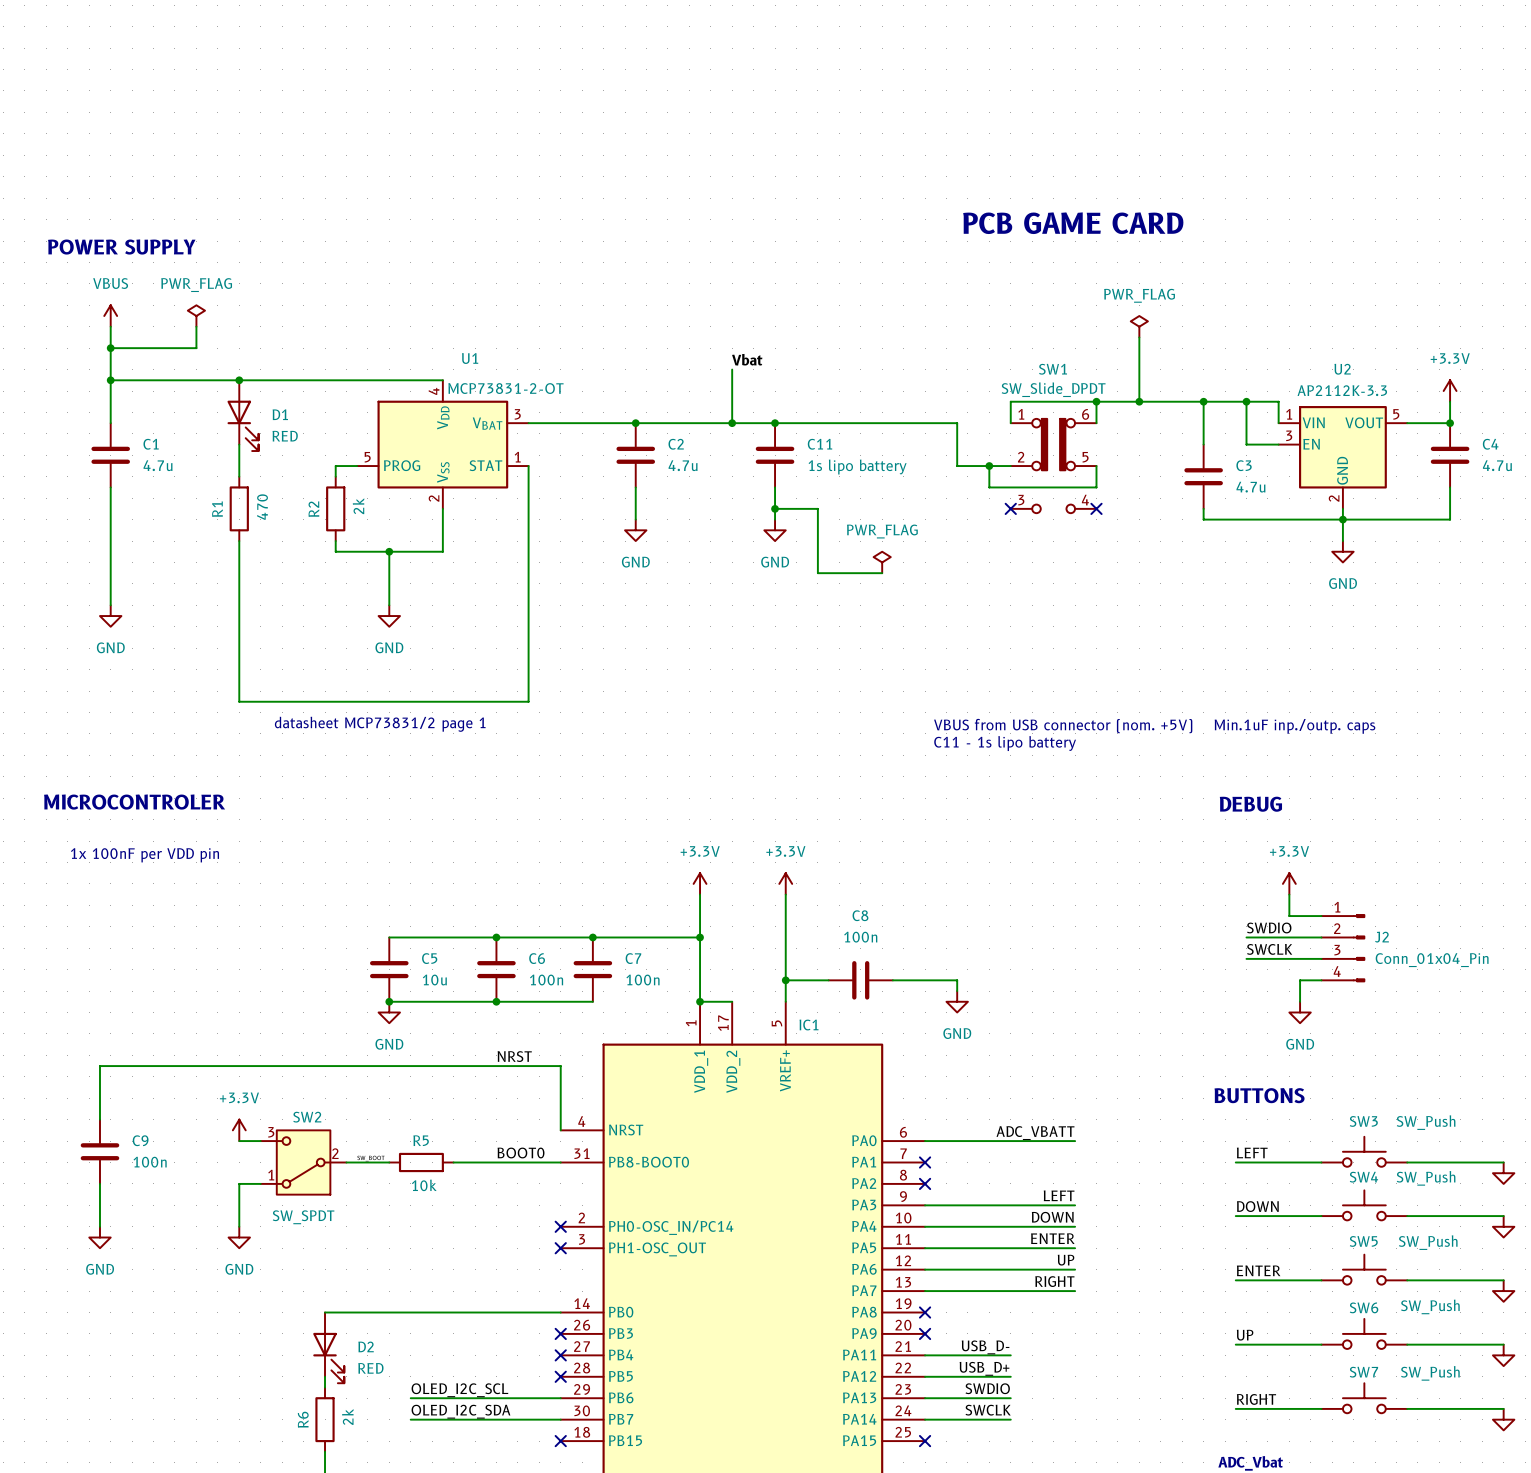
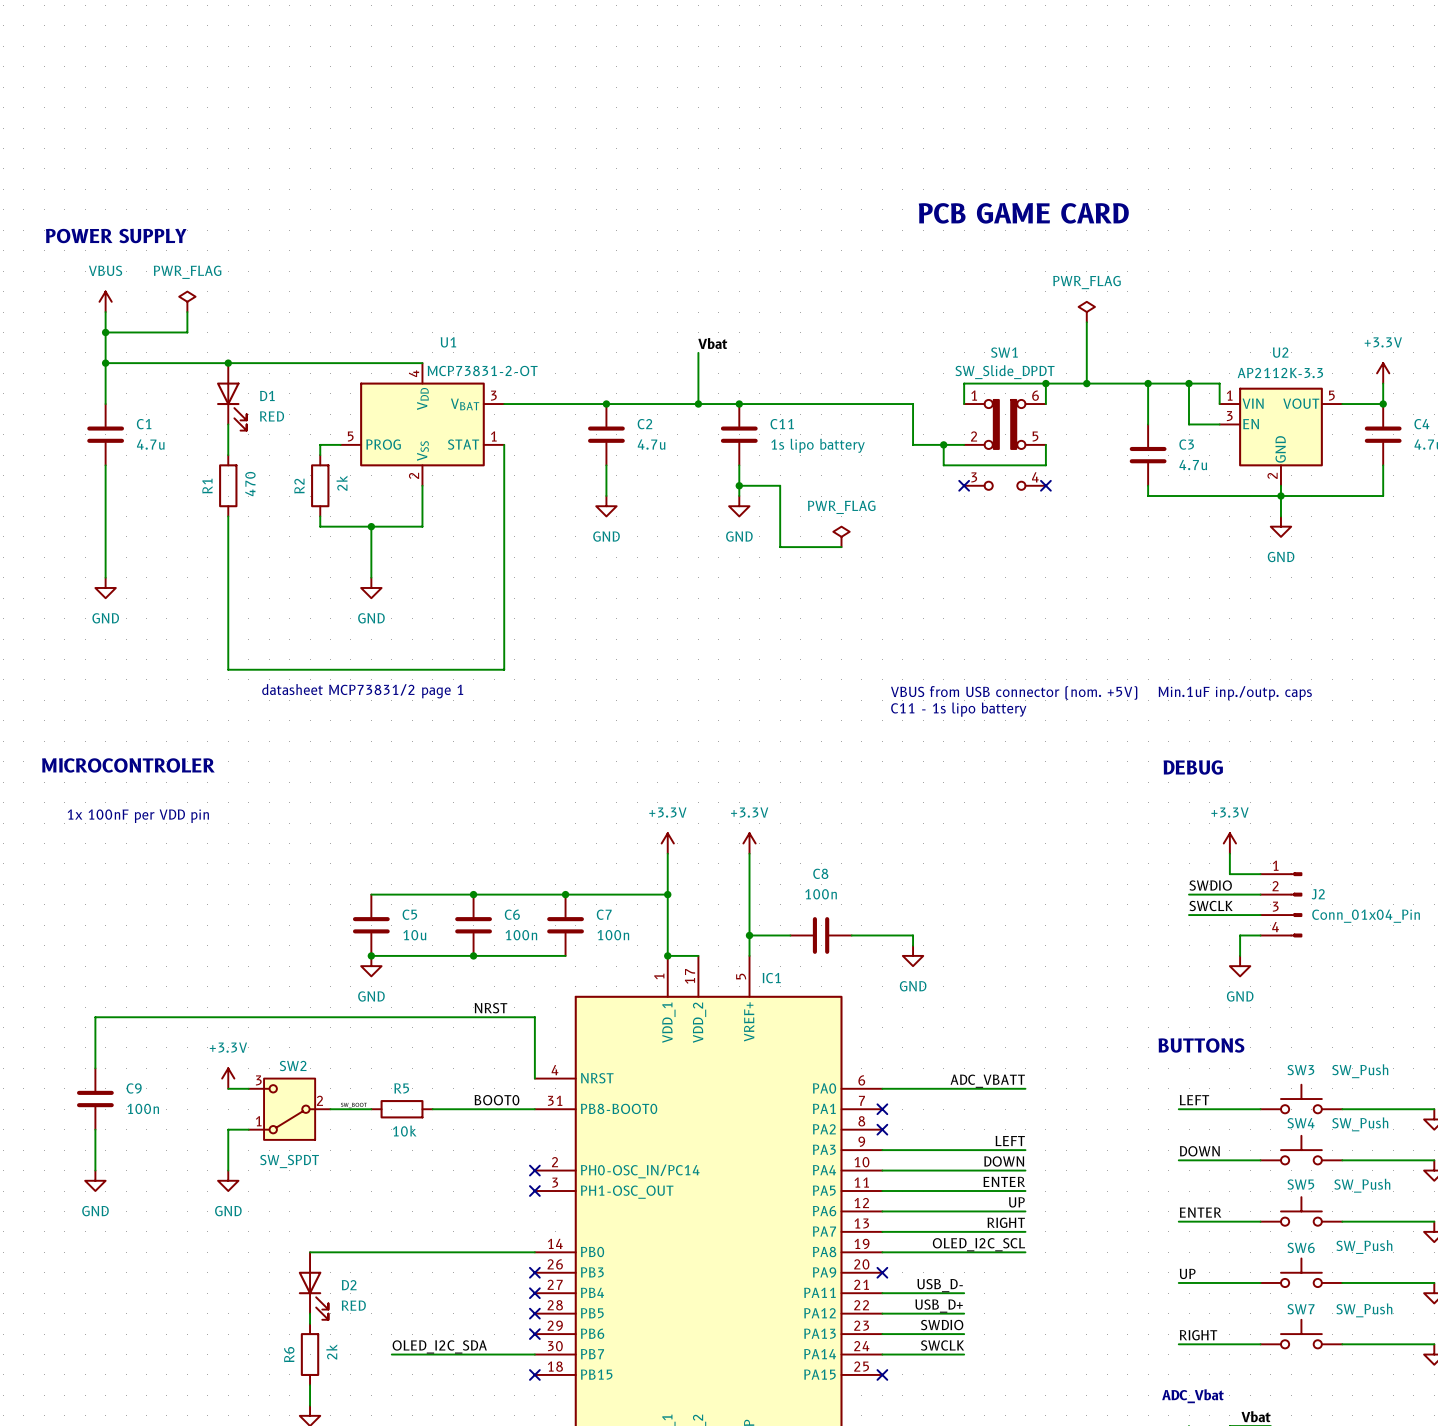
label: none -> OLED_I2C_SCL (978, 1244)
wire: none -> (882, 1252) (1025, 1252)
no-connect mark: (925, 1312) -> none
label: OLED_I2C_SCL (459, 1390) -> none
wire: (410, 1398) (560, 1398) -> none
no-connect mark: none -> (534, 1334)

